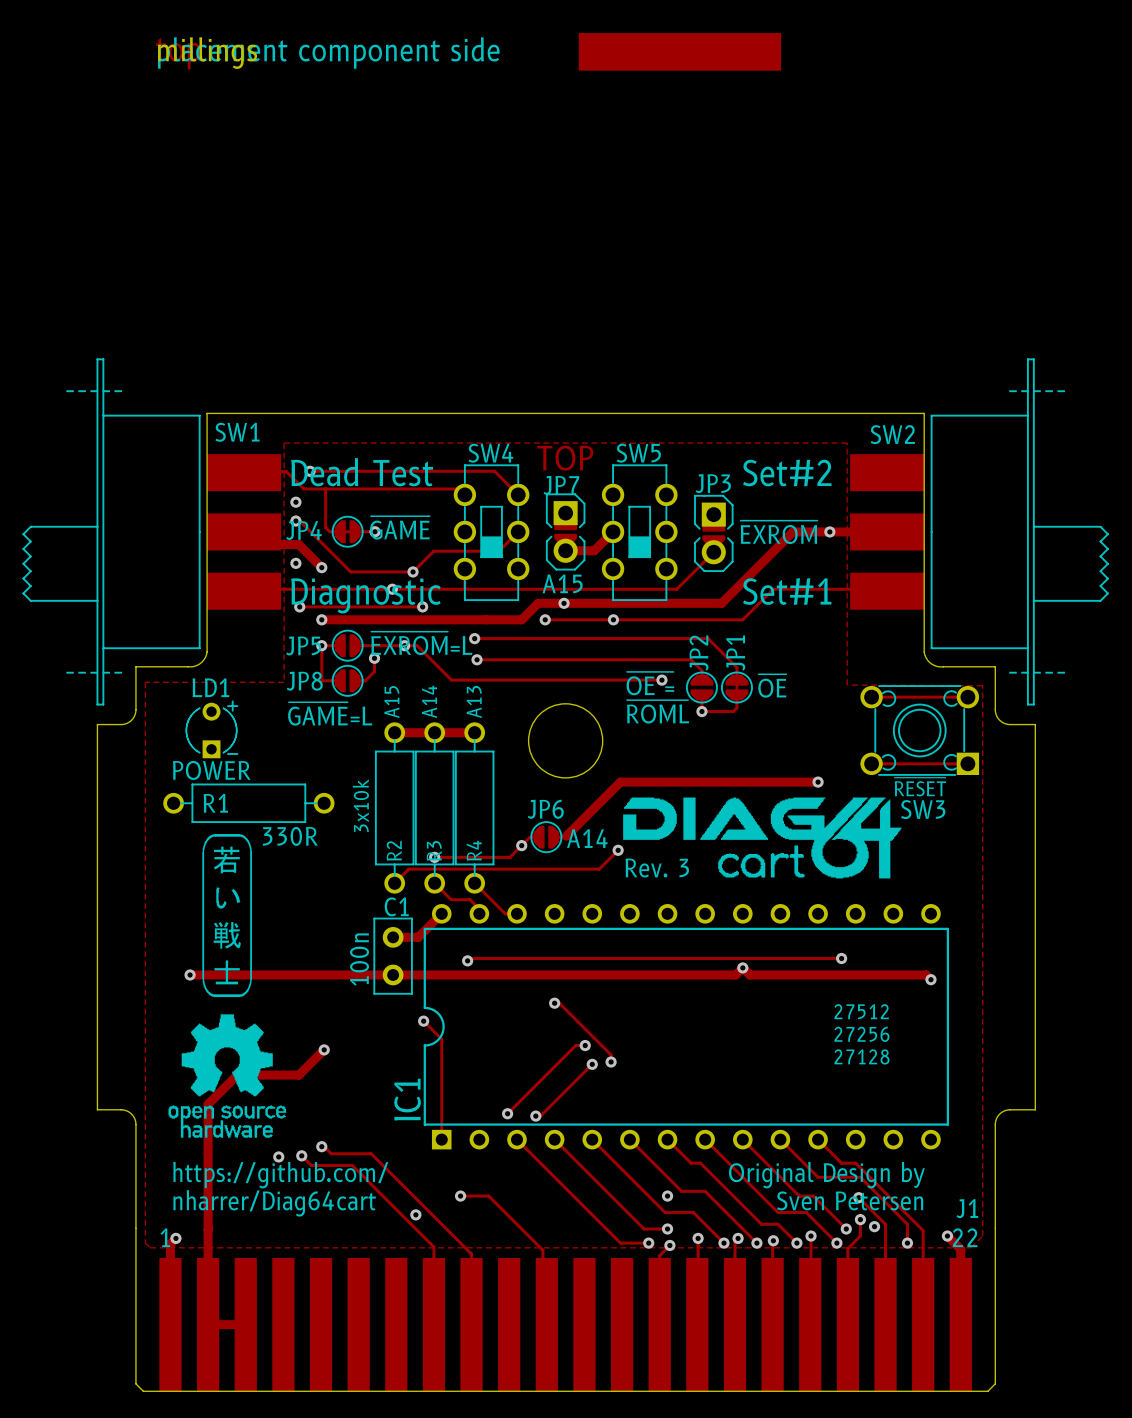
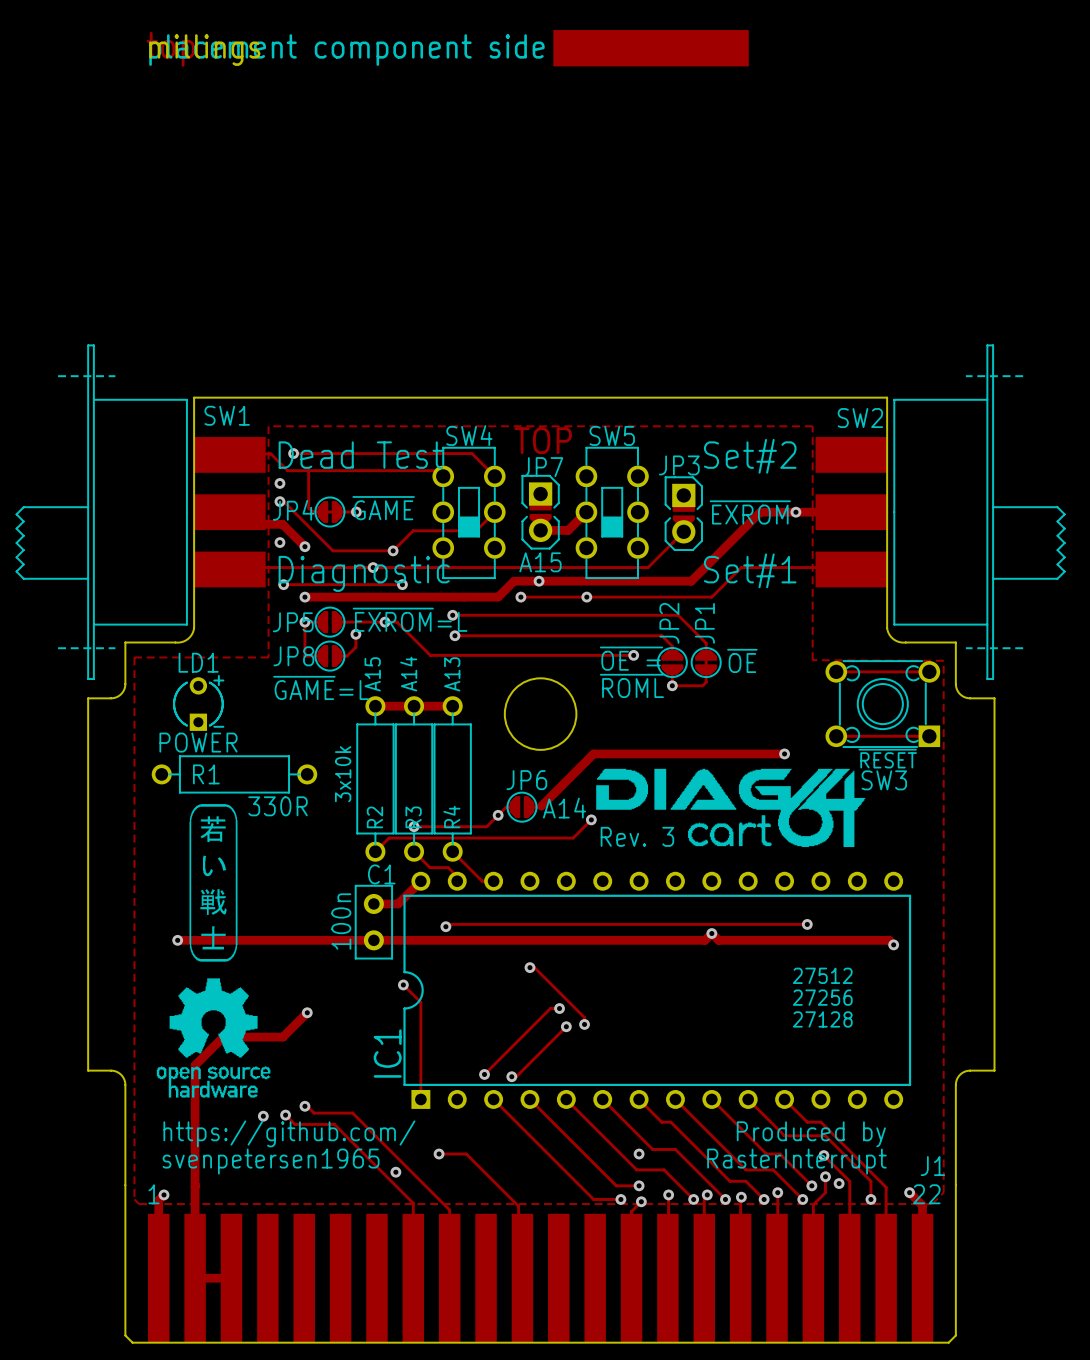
text: Original Design by (826, 1175) -> Produced by (811, 1134)
text: Sven Petersen (850, 1200) -> RasterInterrupt (796, 1161)
text: nharrer/Diag64cart (274, 1203) -> svenpetersen1965 (271, 1161)

